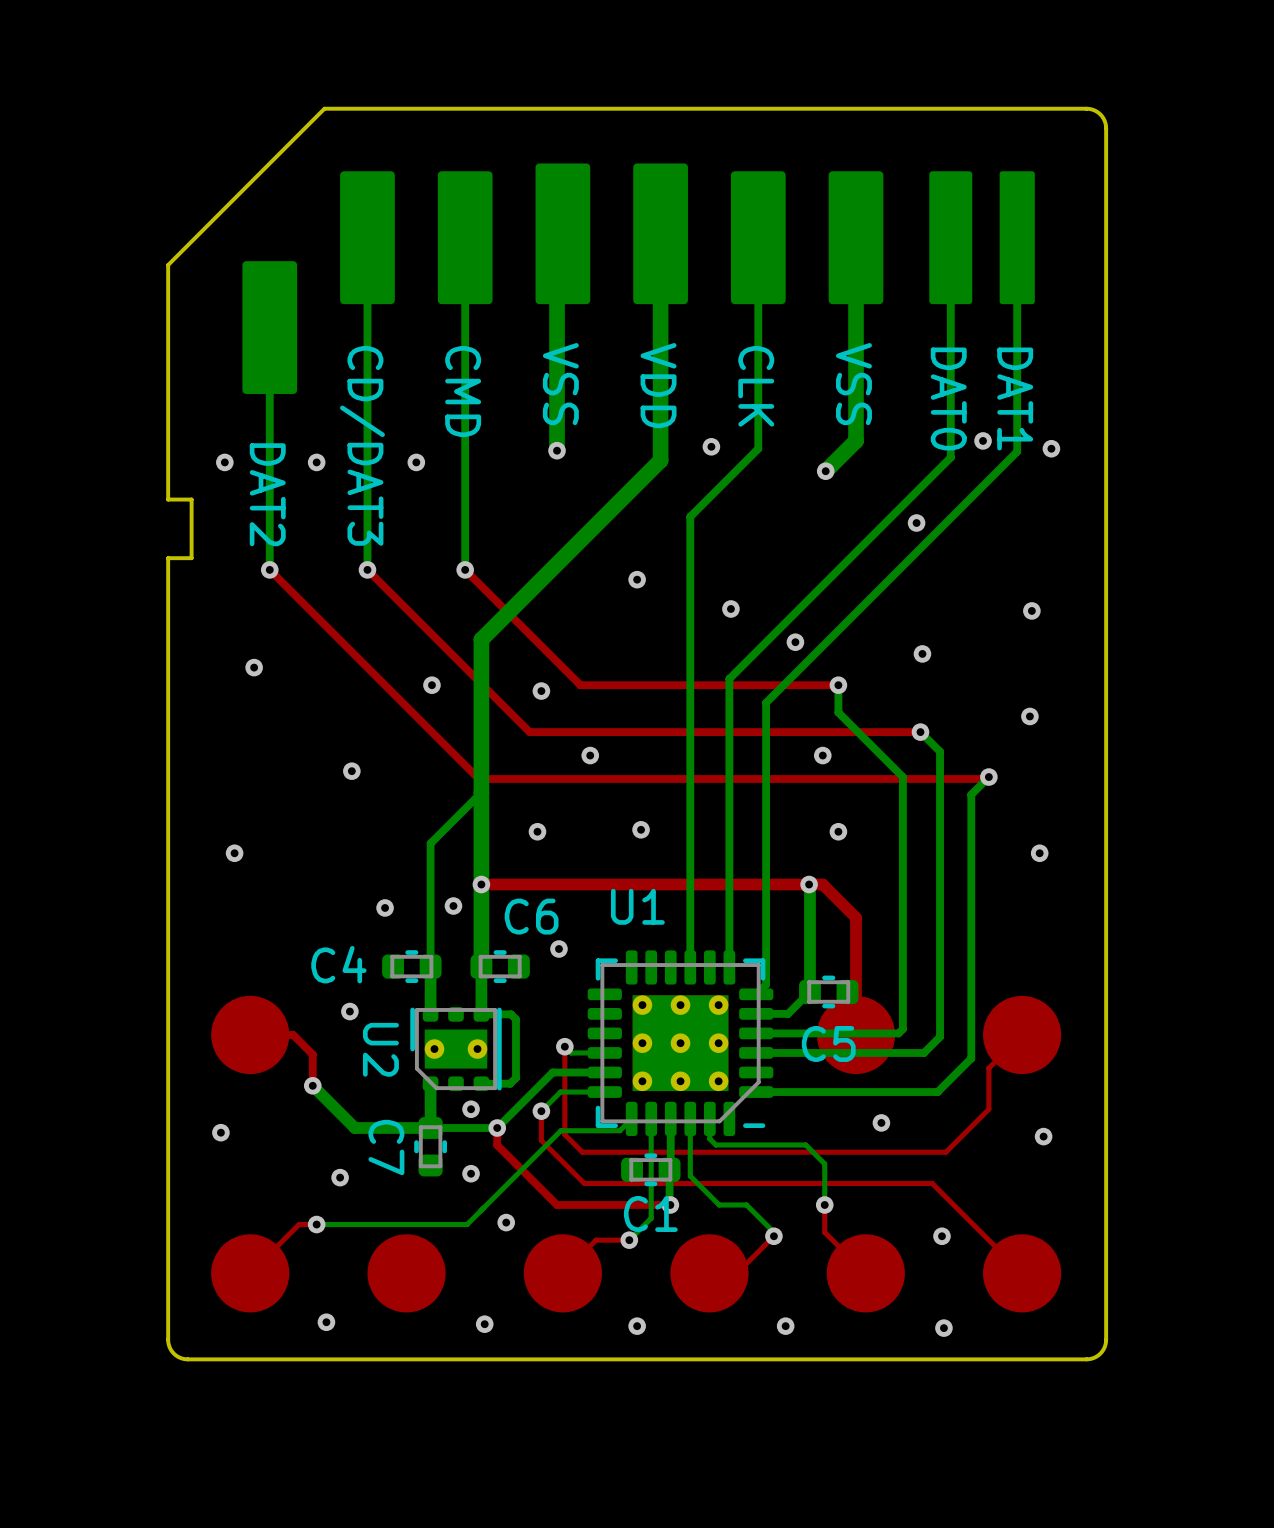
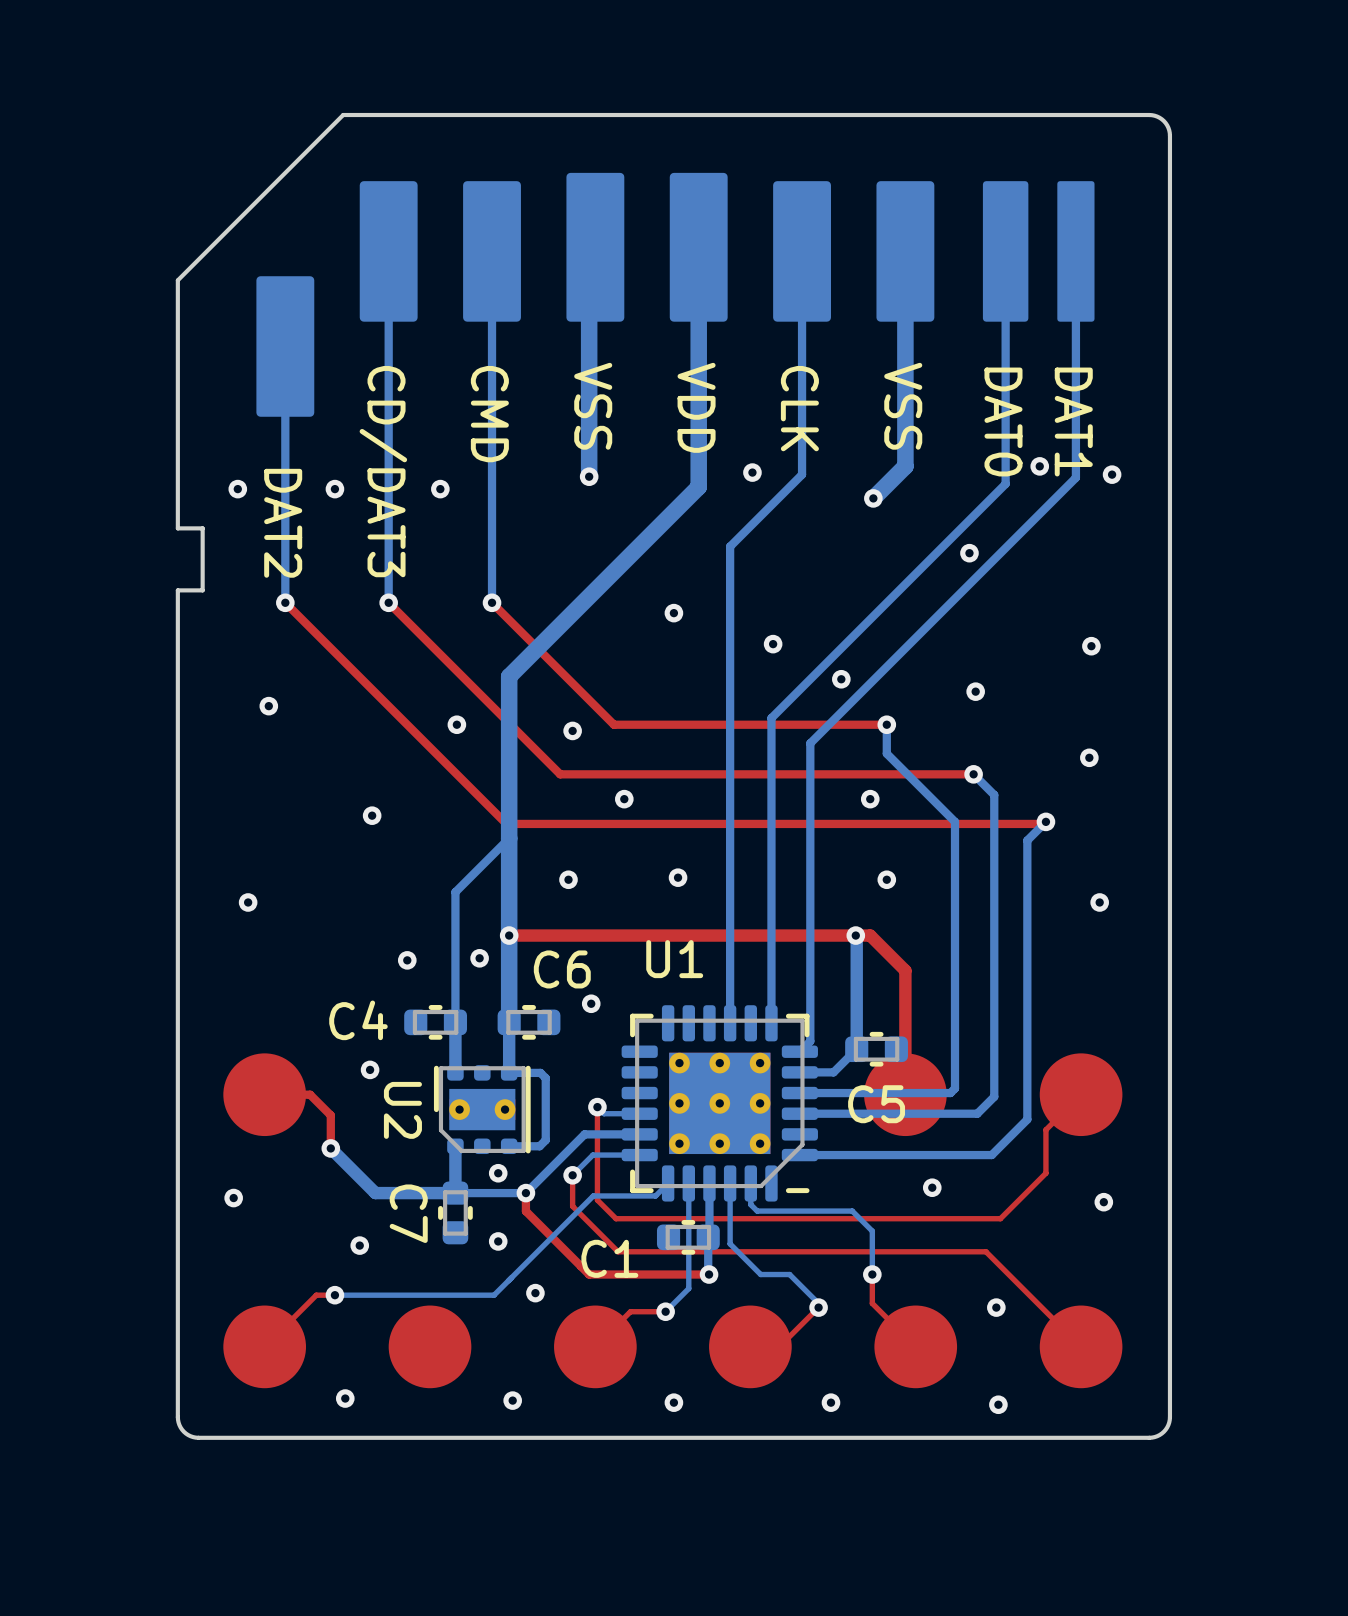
C1 name position: C1 (650, 1213) -> C1 (609, 1258)

